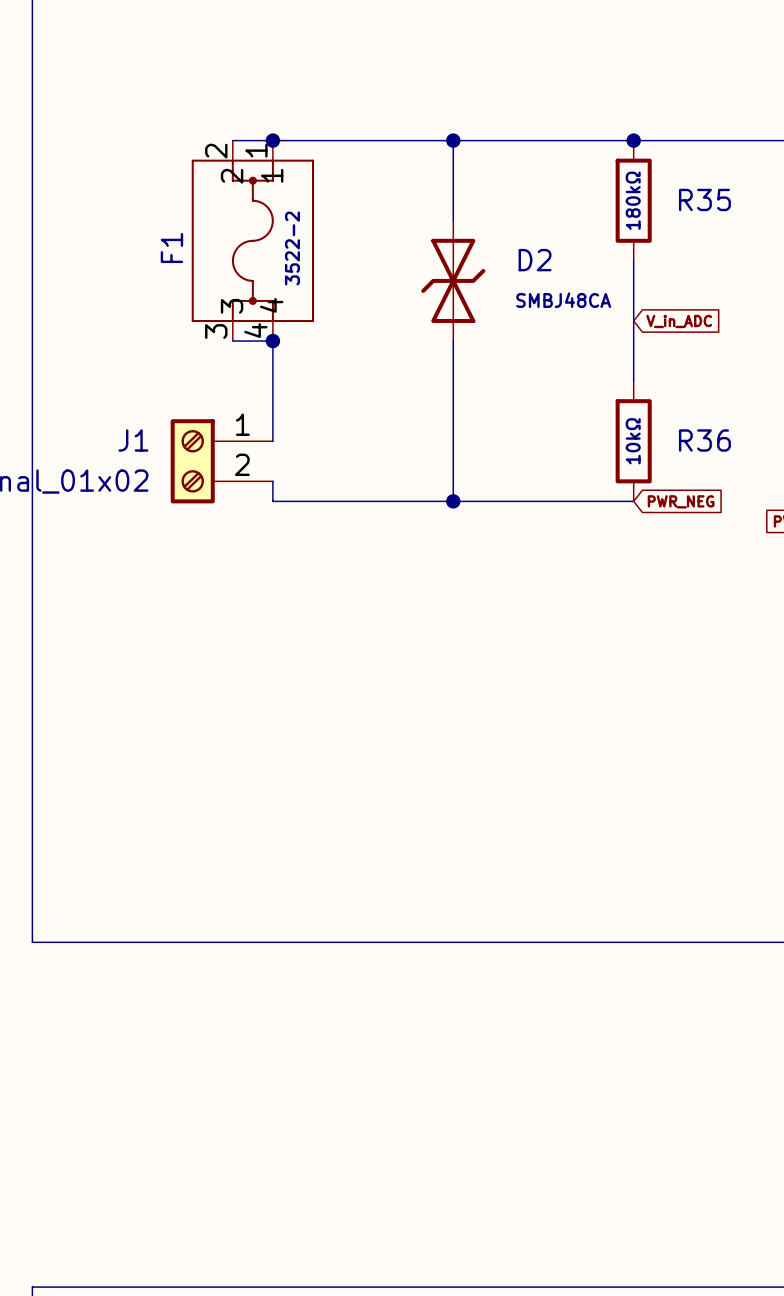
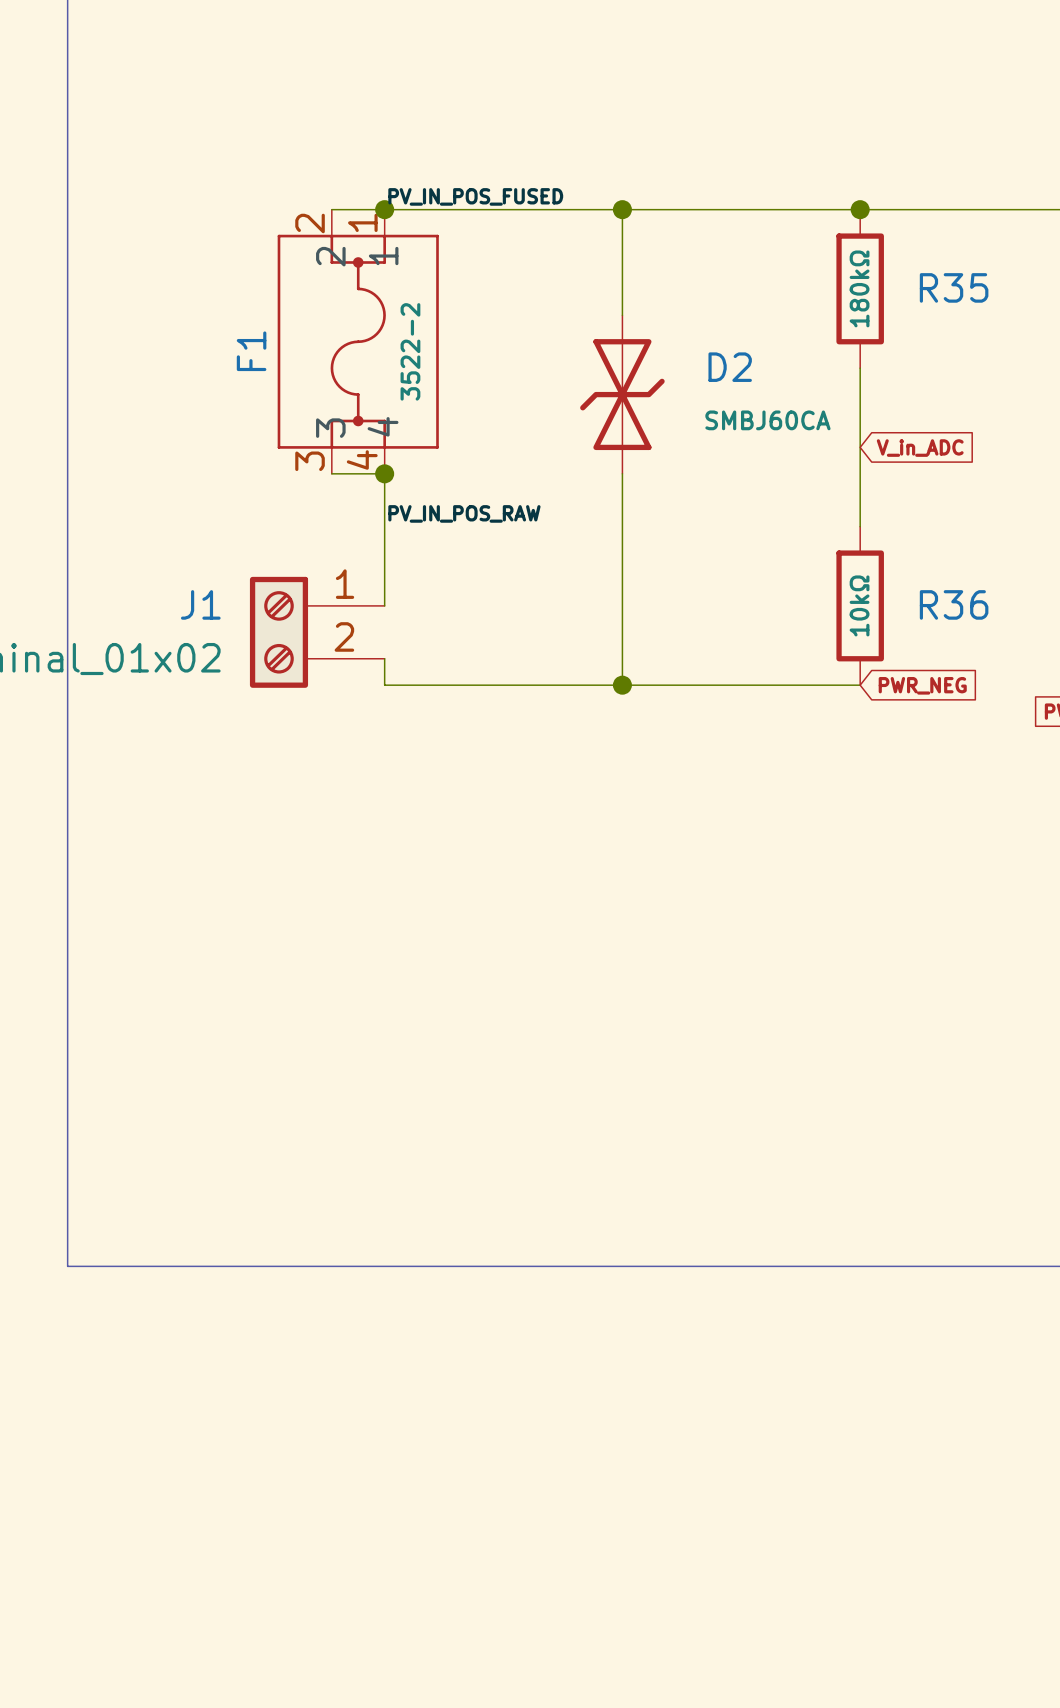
label: none -> PV_IN_POS_FUSED (475, 196)
D2 value: SMBJ48CA (563, 300) -> SMBJ60CA (767, 420)
label: none -> PV_IN_POS_RAW (464, 513)

